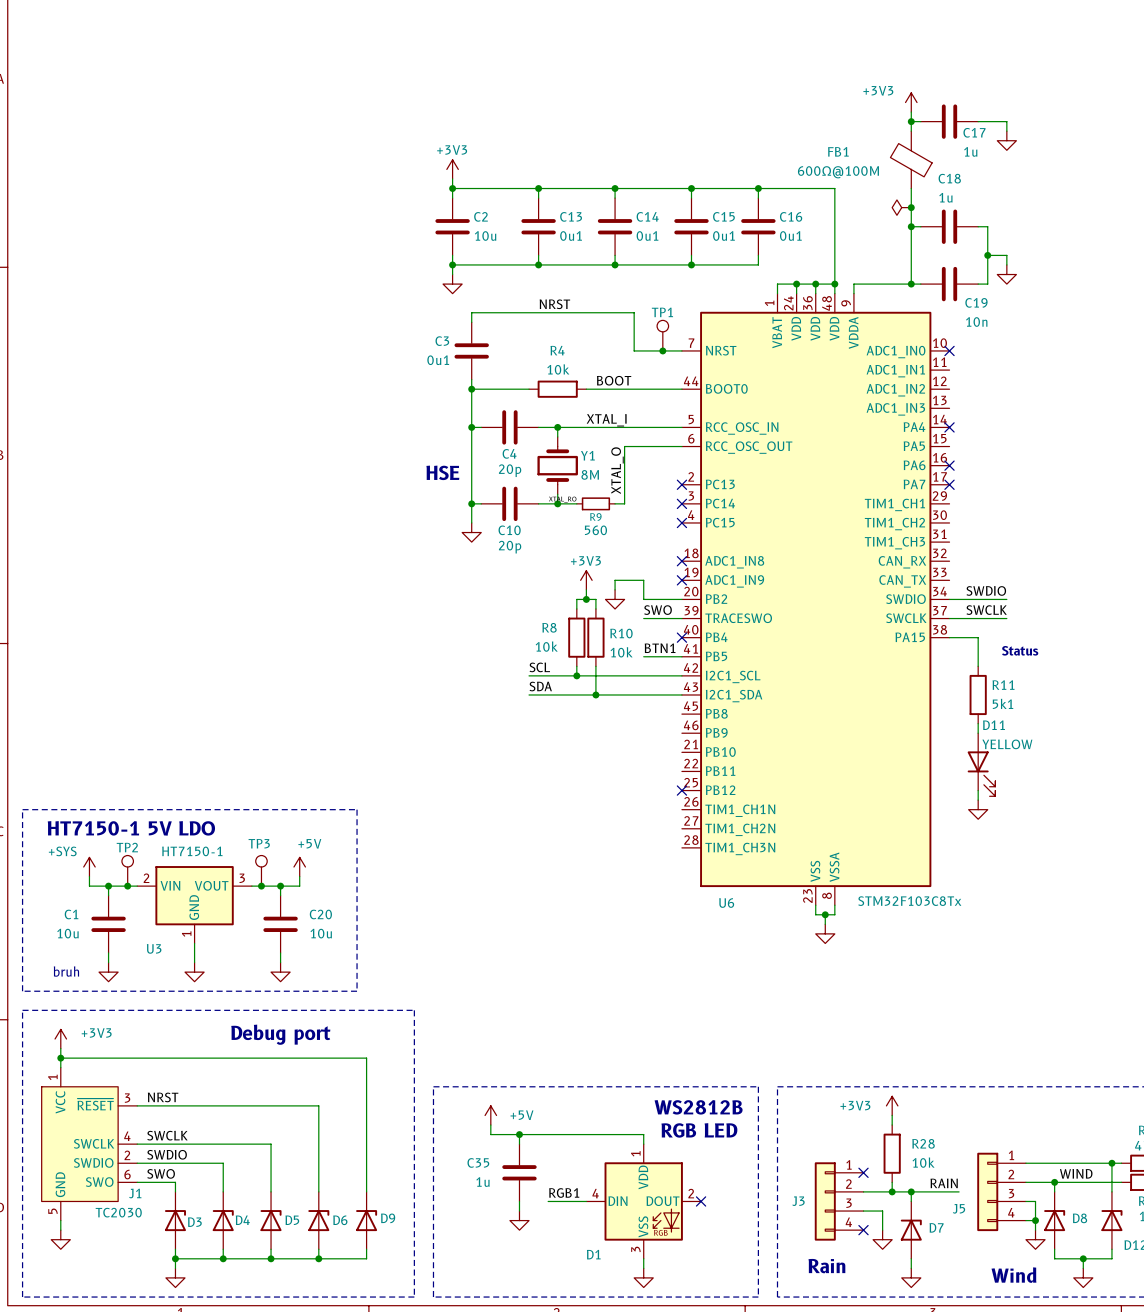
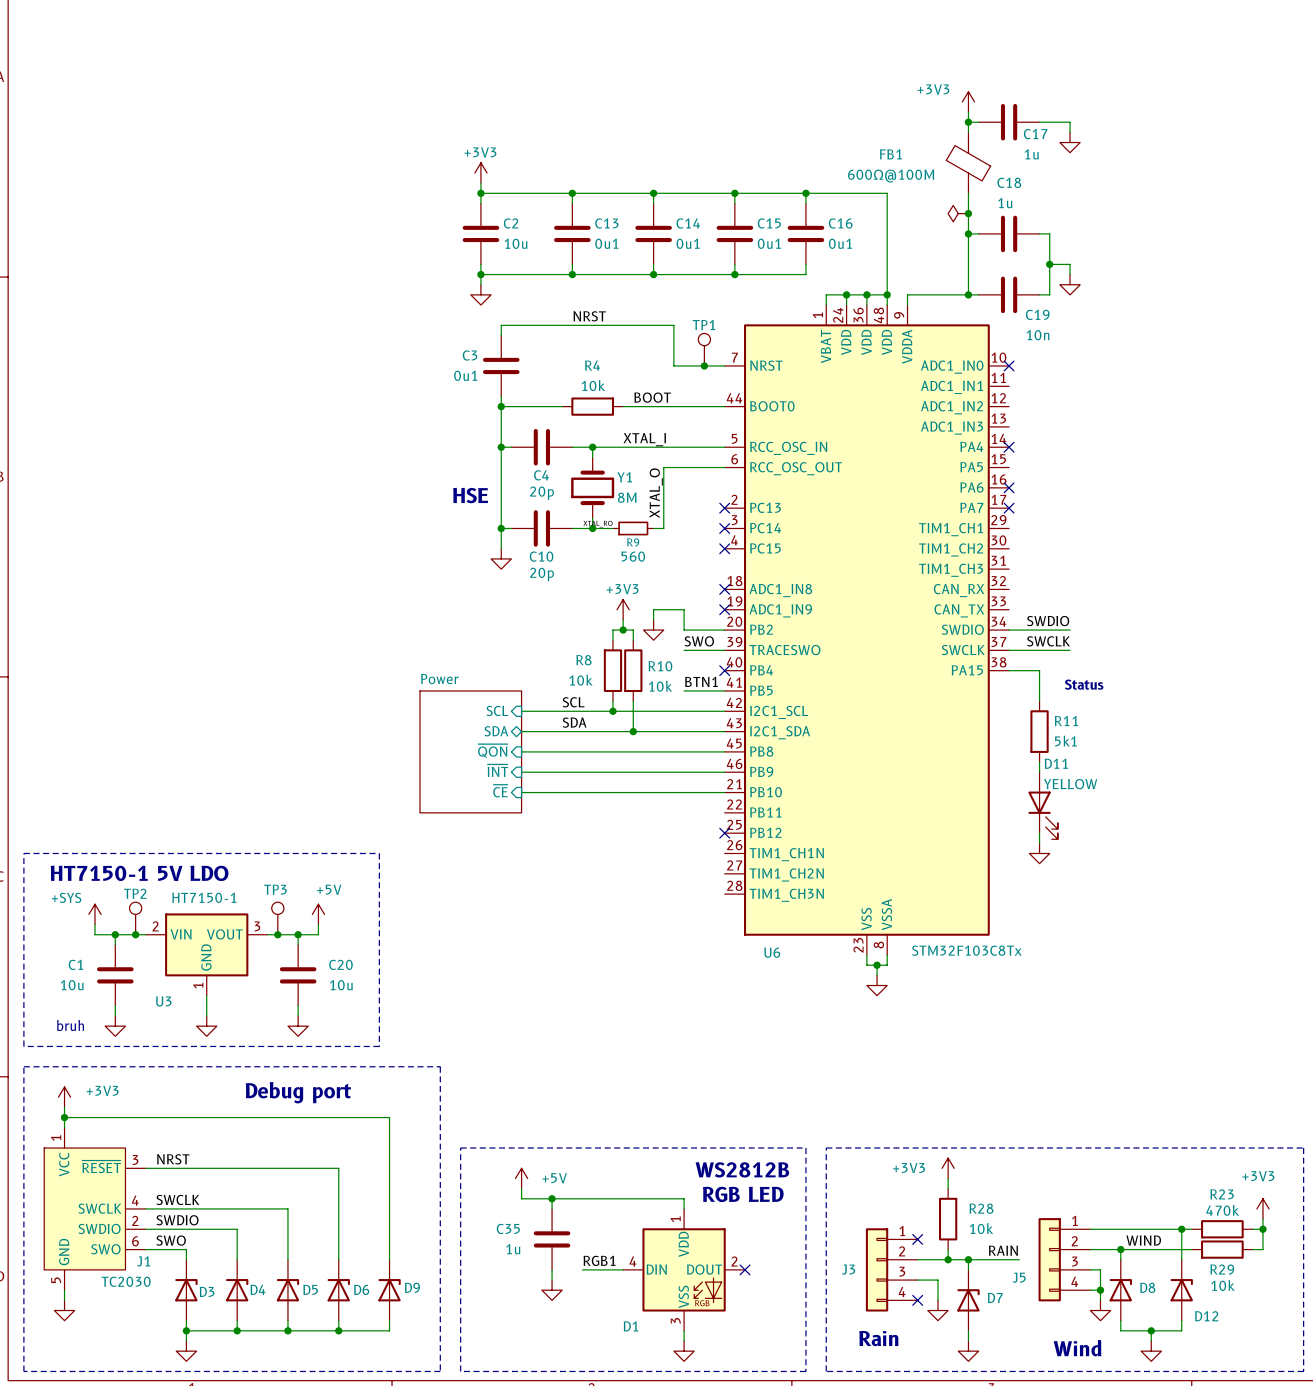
sheet pin: none -> SCL (497, 710)
wire: none -> (521, 711) (562, 711)
sheet pin: none -> SDA (496, 731)
wire: none -> (521, 731) (562, 731)
sheet pin: none -> ~{QON} (492, 750)
sheet Power: none -> (470, 751)
wire: none -> (521, 751) (724, 751)
sheet pin: none -> ~{INT} (497, 770)
wire: none -> (521, 772) (724, 772)
sheet pin: none -> ~{CE} (500, 791)
wire: none -> (521, 792) (724, 792)

